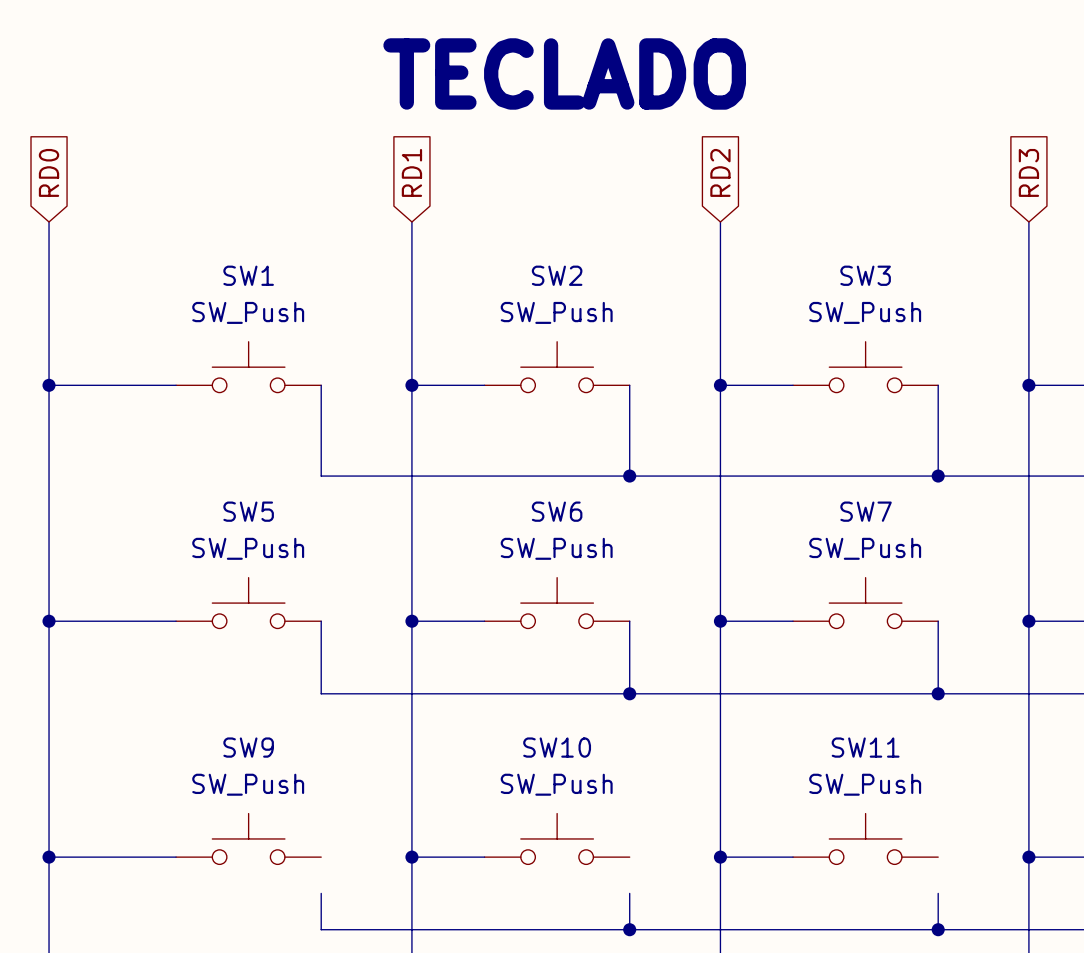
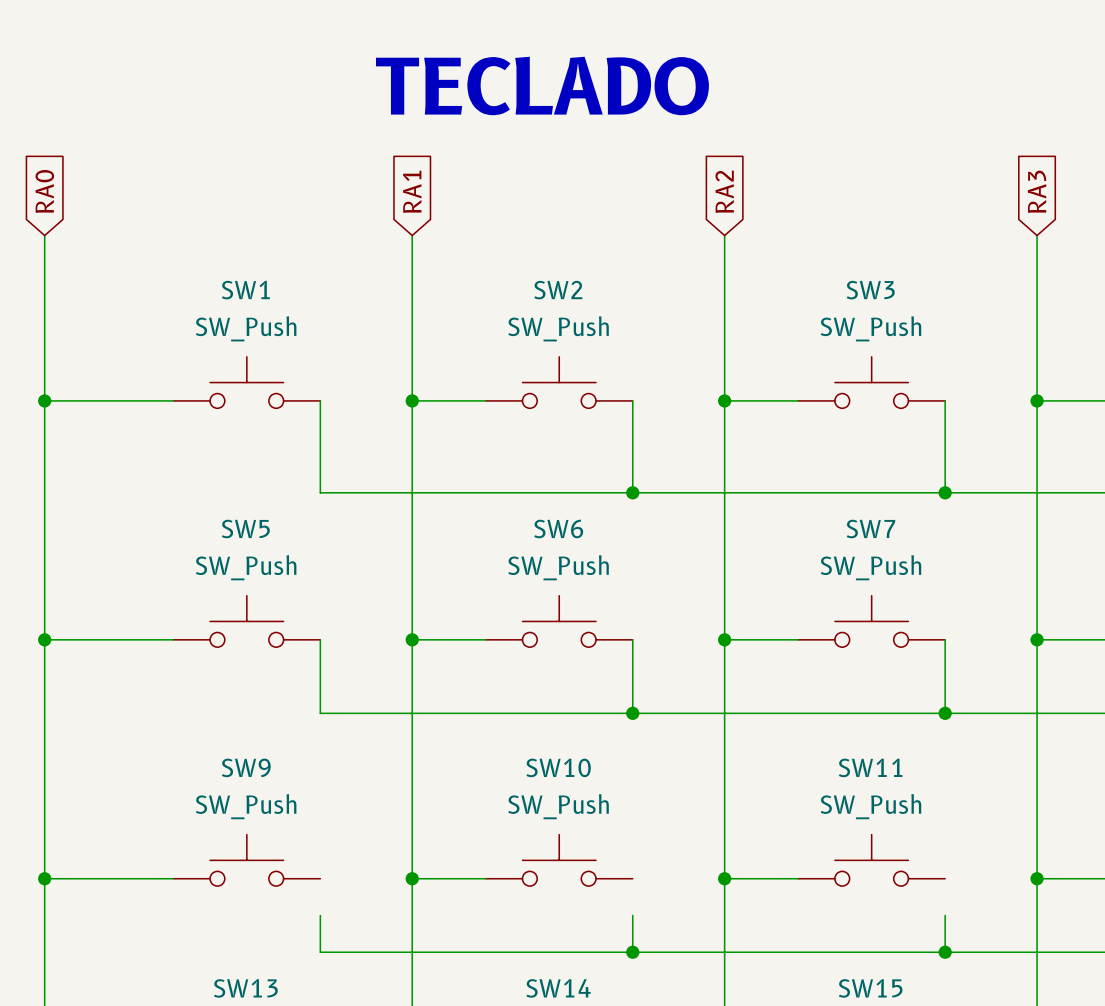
global label: RD0 (49, 172) -> RA0 (44, 191)
global label: RD1 (411, 172) -> RA1 (412, 191)
global label: RD2 (720, 172) -> RA2 (724, 191)
global label: RD3 (1028, 172) -> RA3 (1037, 191)

